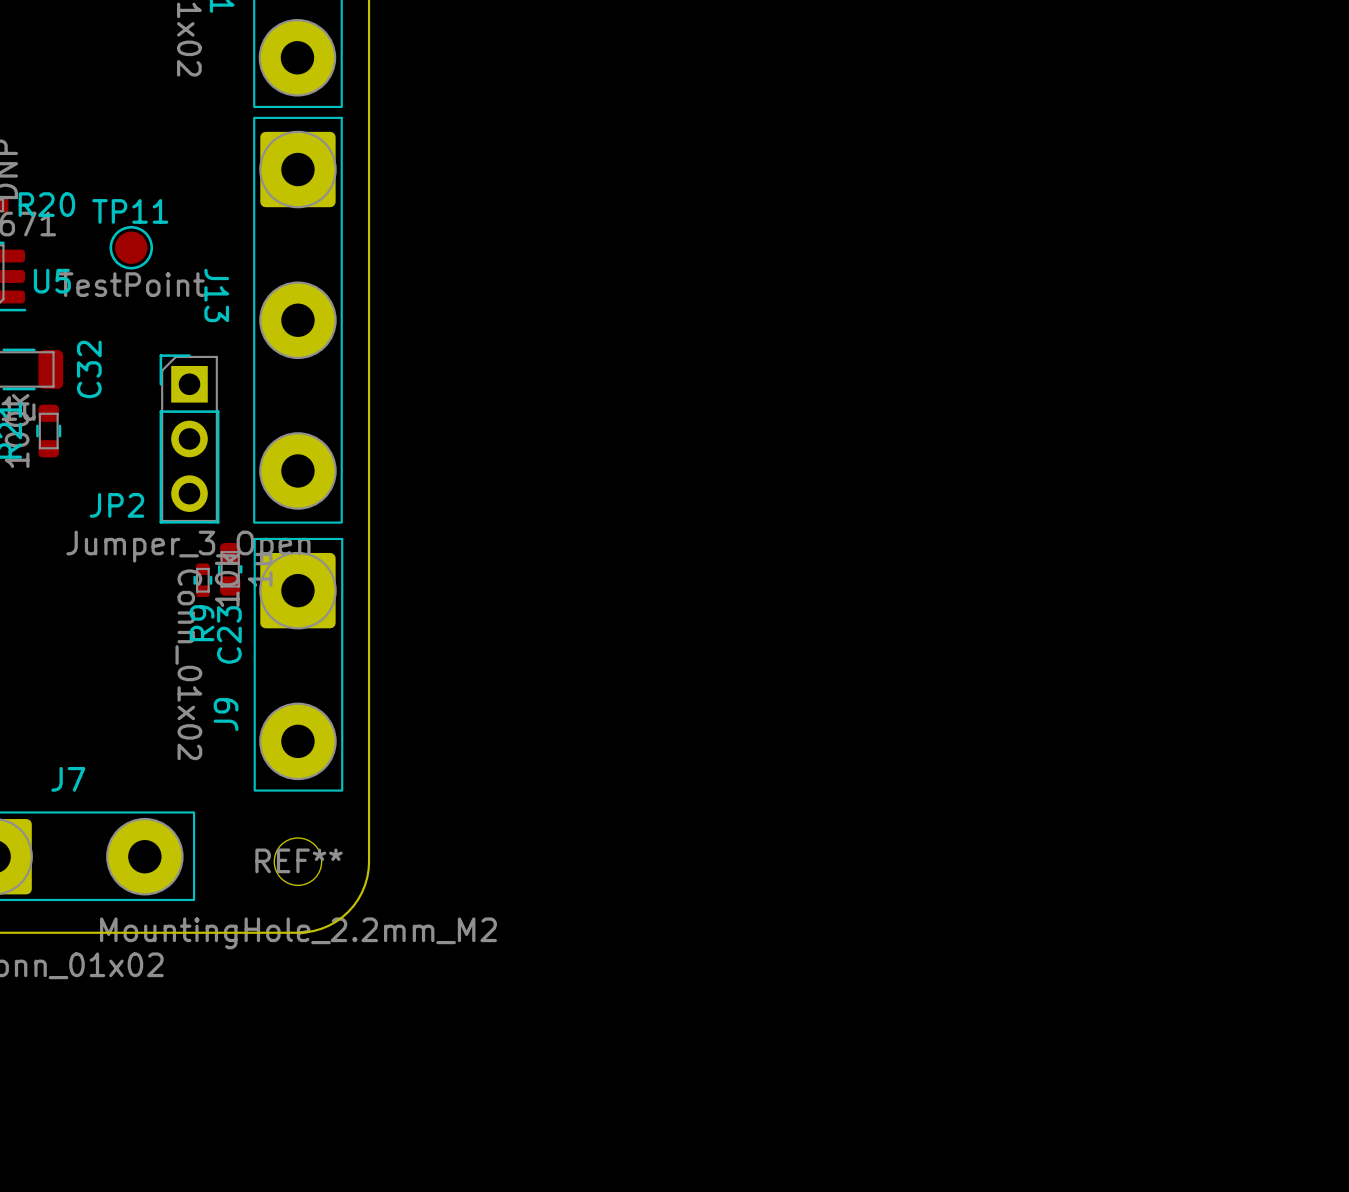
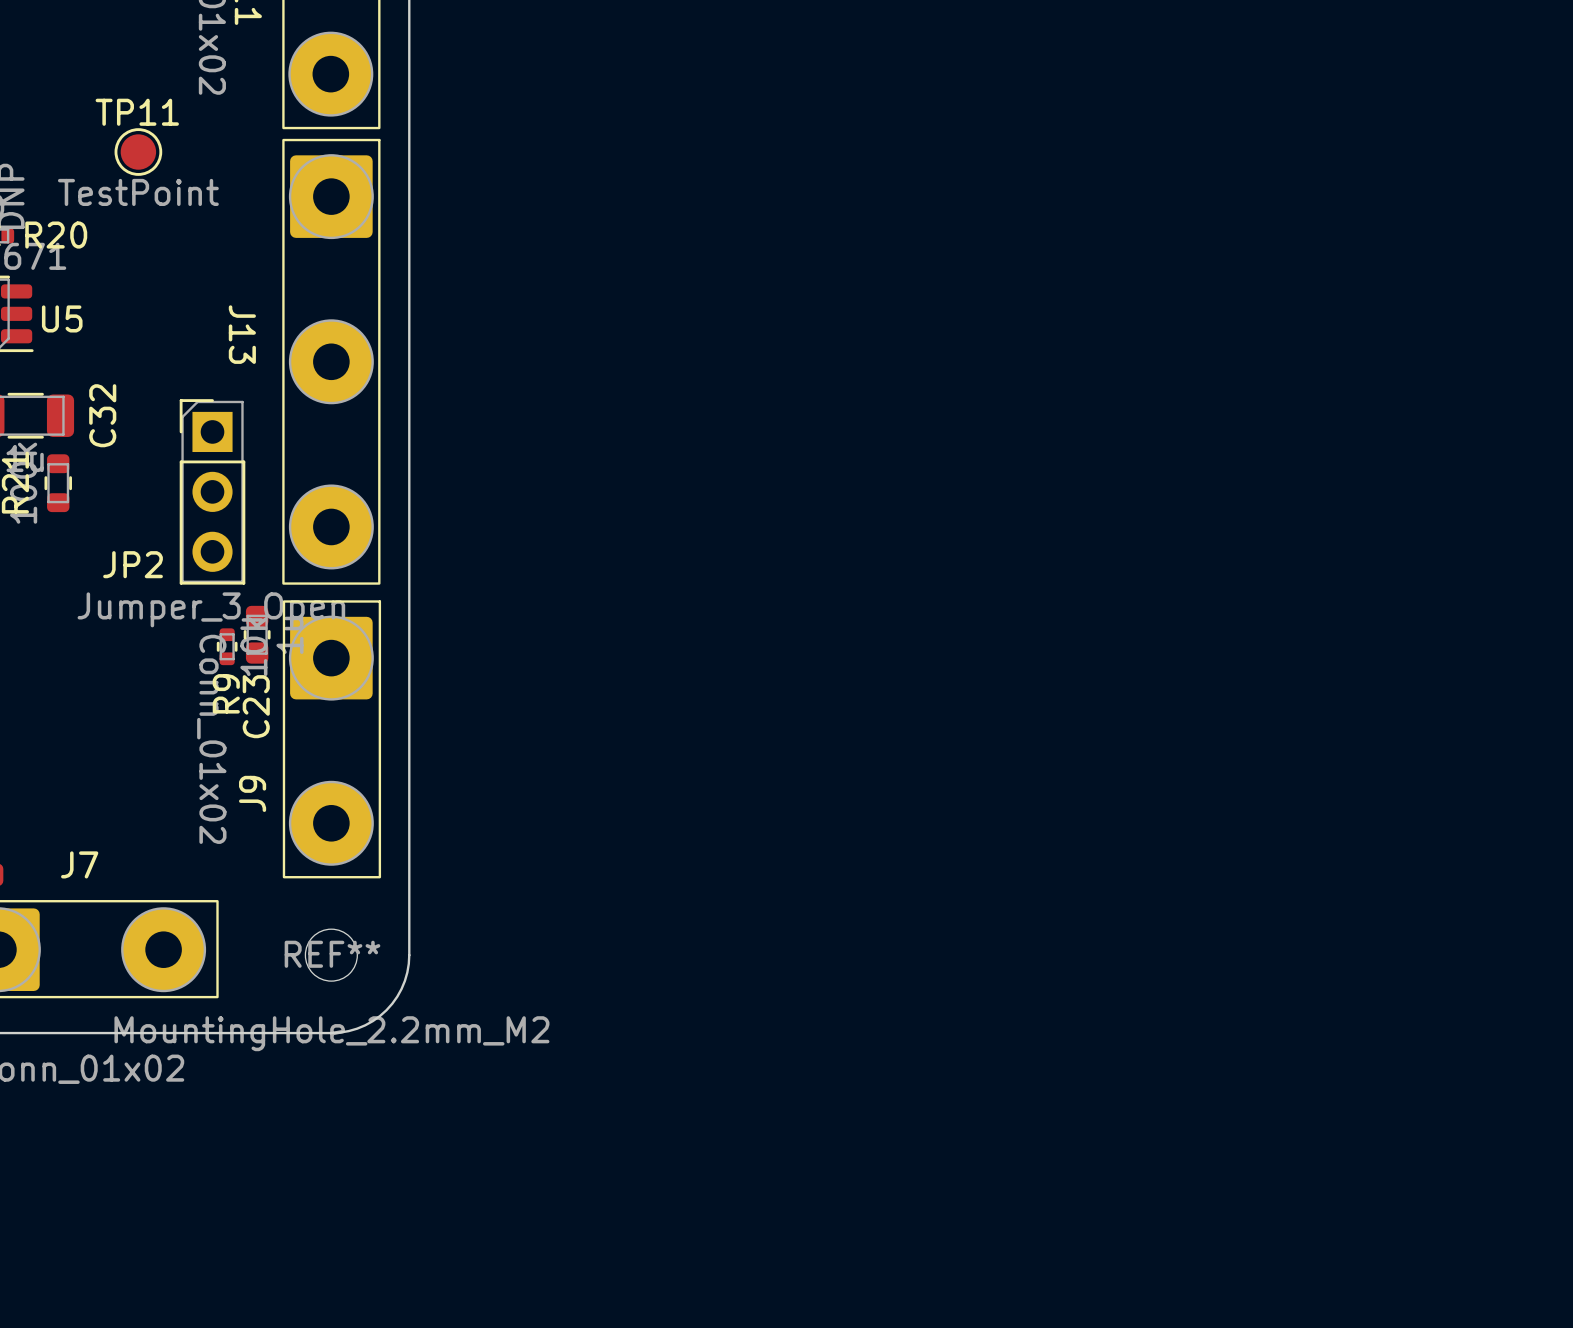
TP11 position: (131, 247) -> (138, 152)

